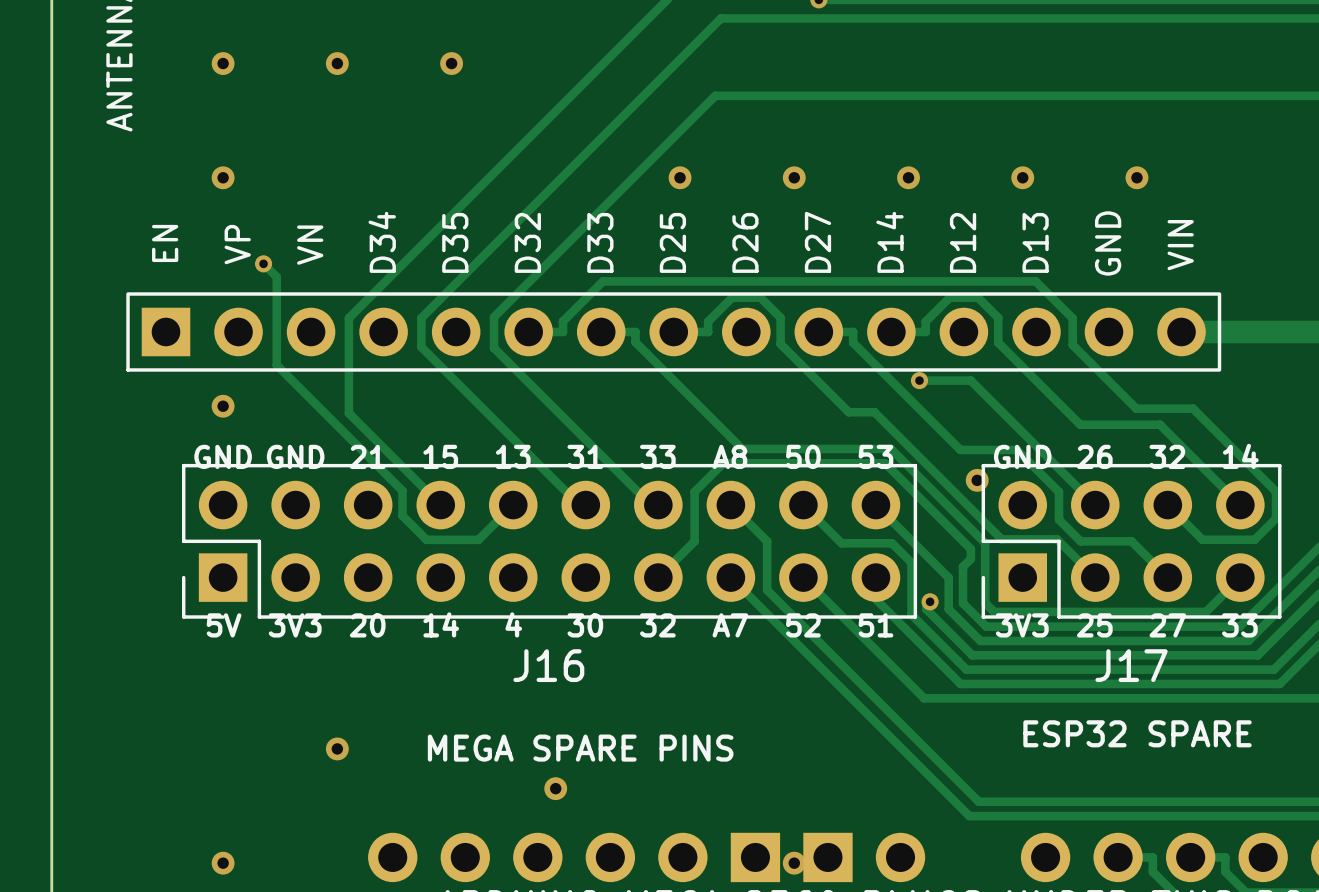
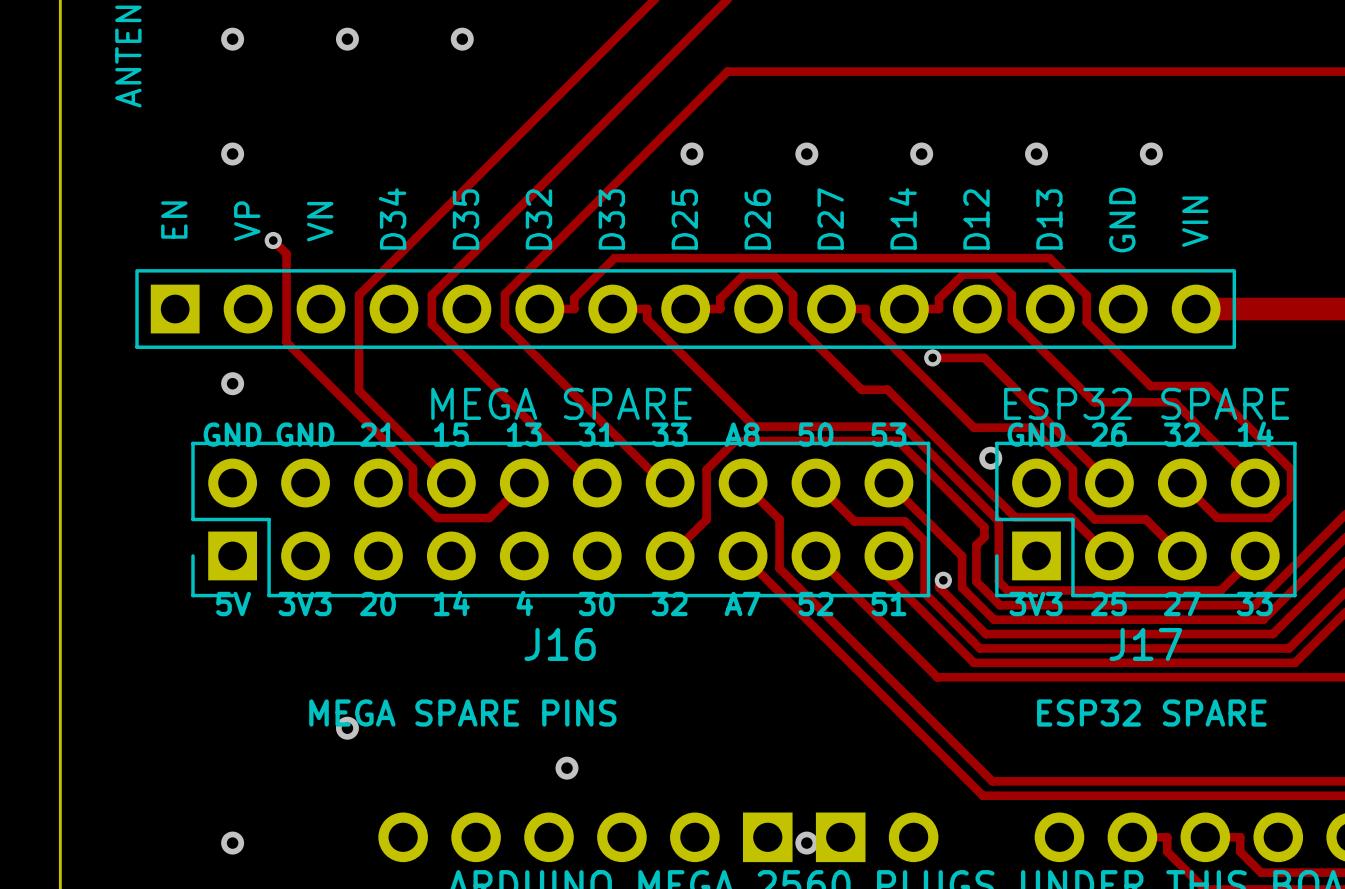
J16 value: none -> MEGA SPARE (561, 403)
J17 value: none -> ESP32 SPARE (1146, 403)
text position: MEGA SPARE PINS (580, 748) -> MEGA SPARE PINS (462, 713)

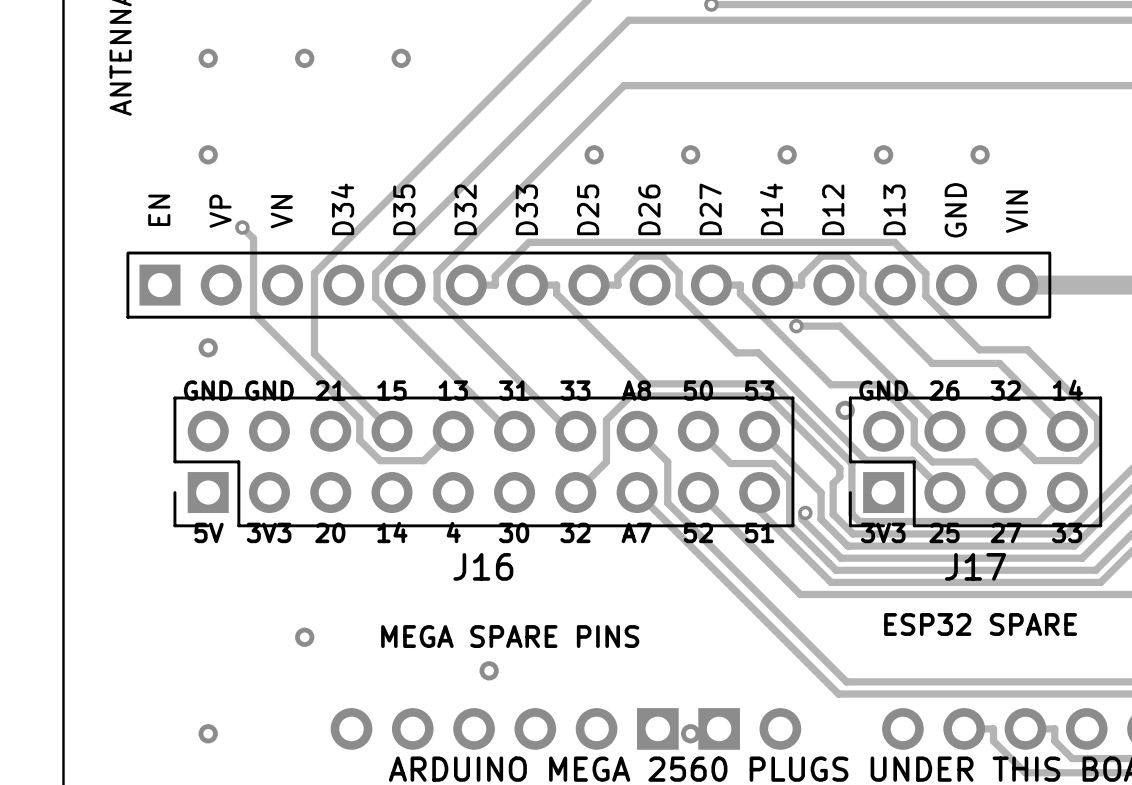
J16 value: MEGA SPARE (561, 403) -> none
J17 value: ESP32 SPARE (1146, 403) -> none
text position: MEGA SPARE PINS (462, 713) -> MEGA SPARE PINS (510, 636)

